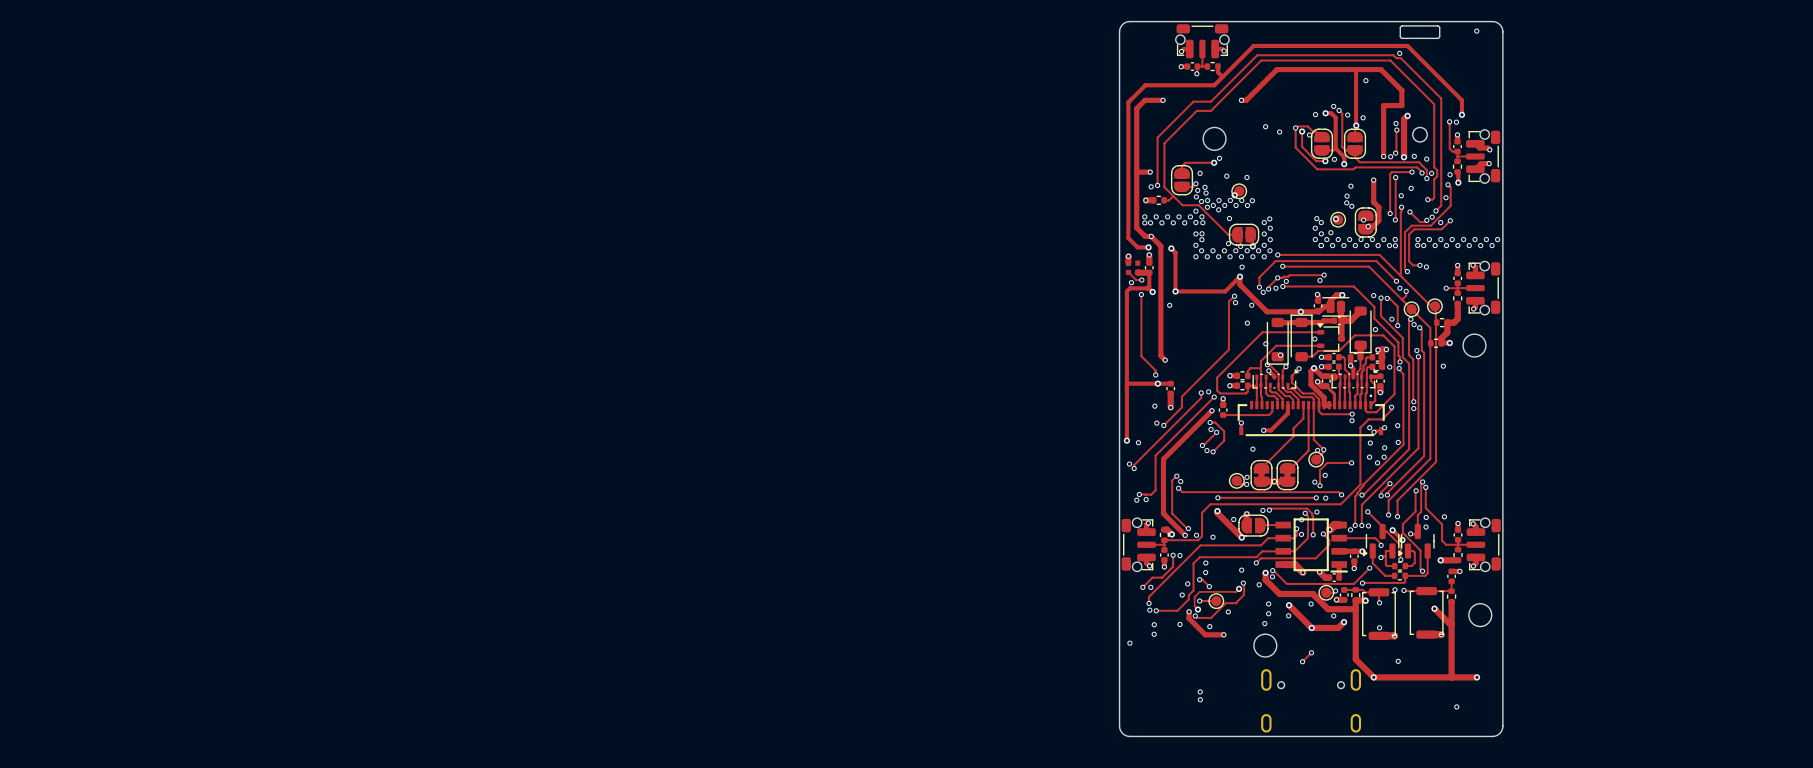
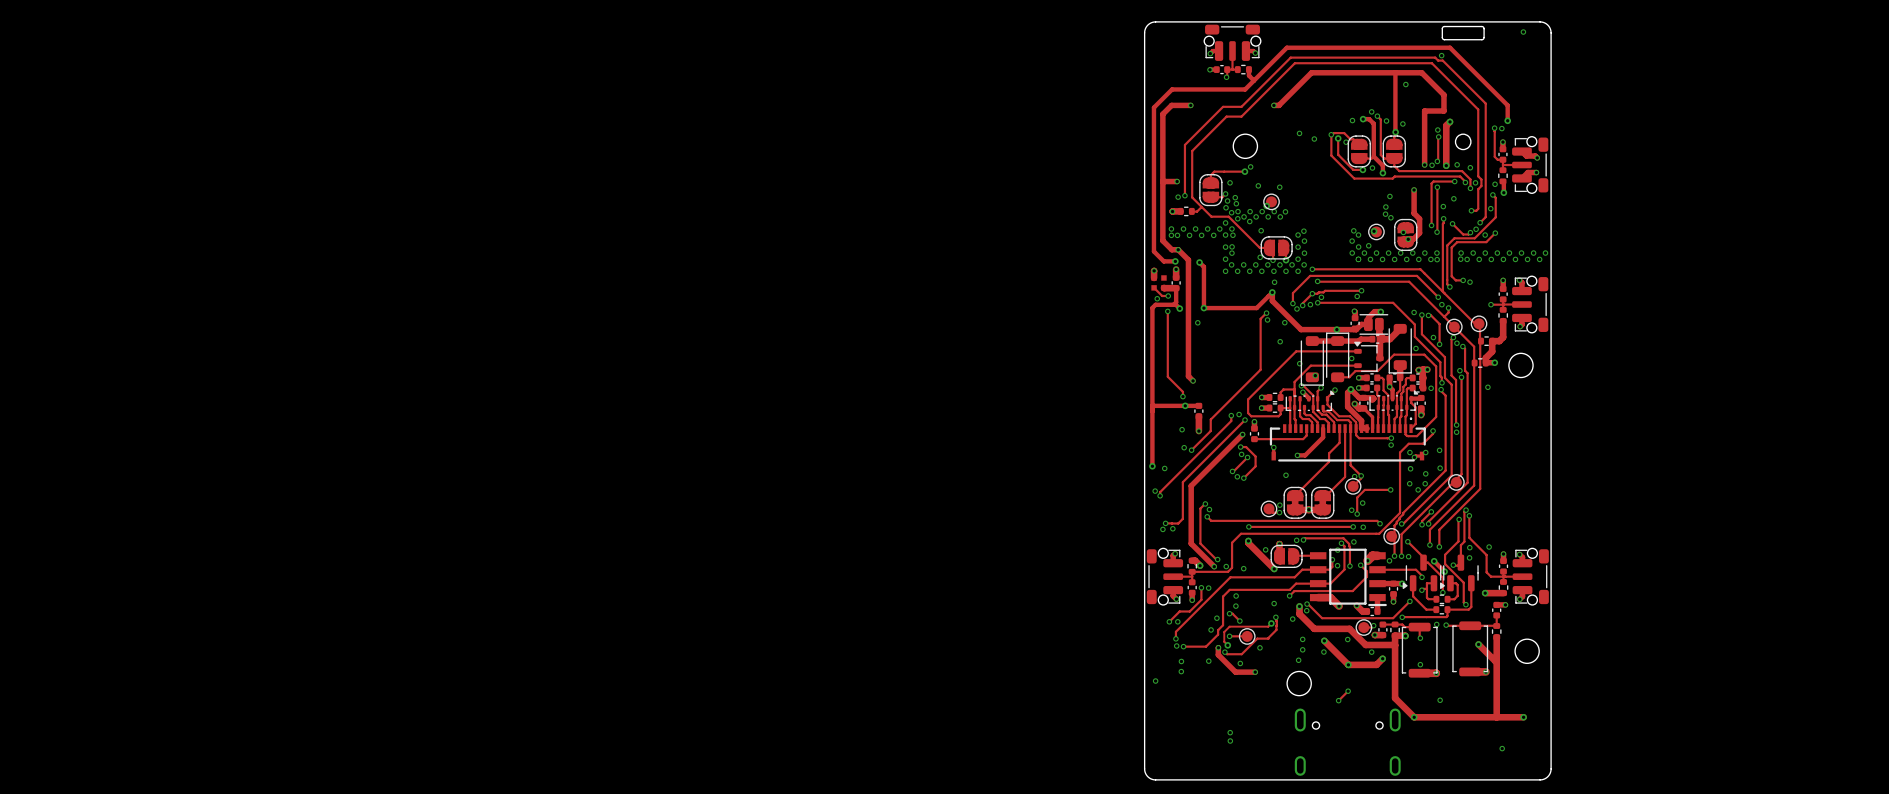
part: none -> (1456, 482)
part: none -> (1391, 536)

